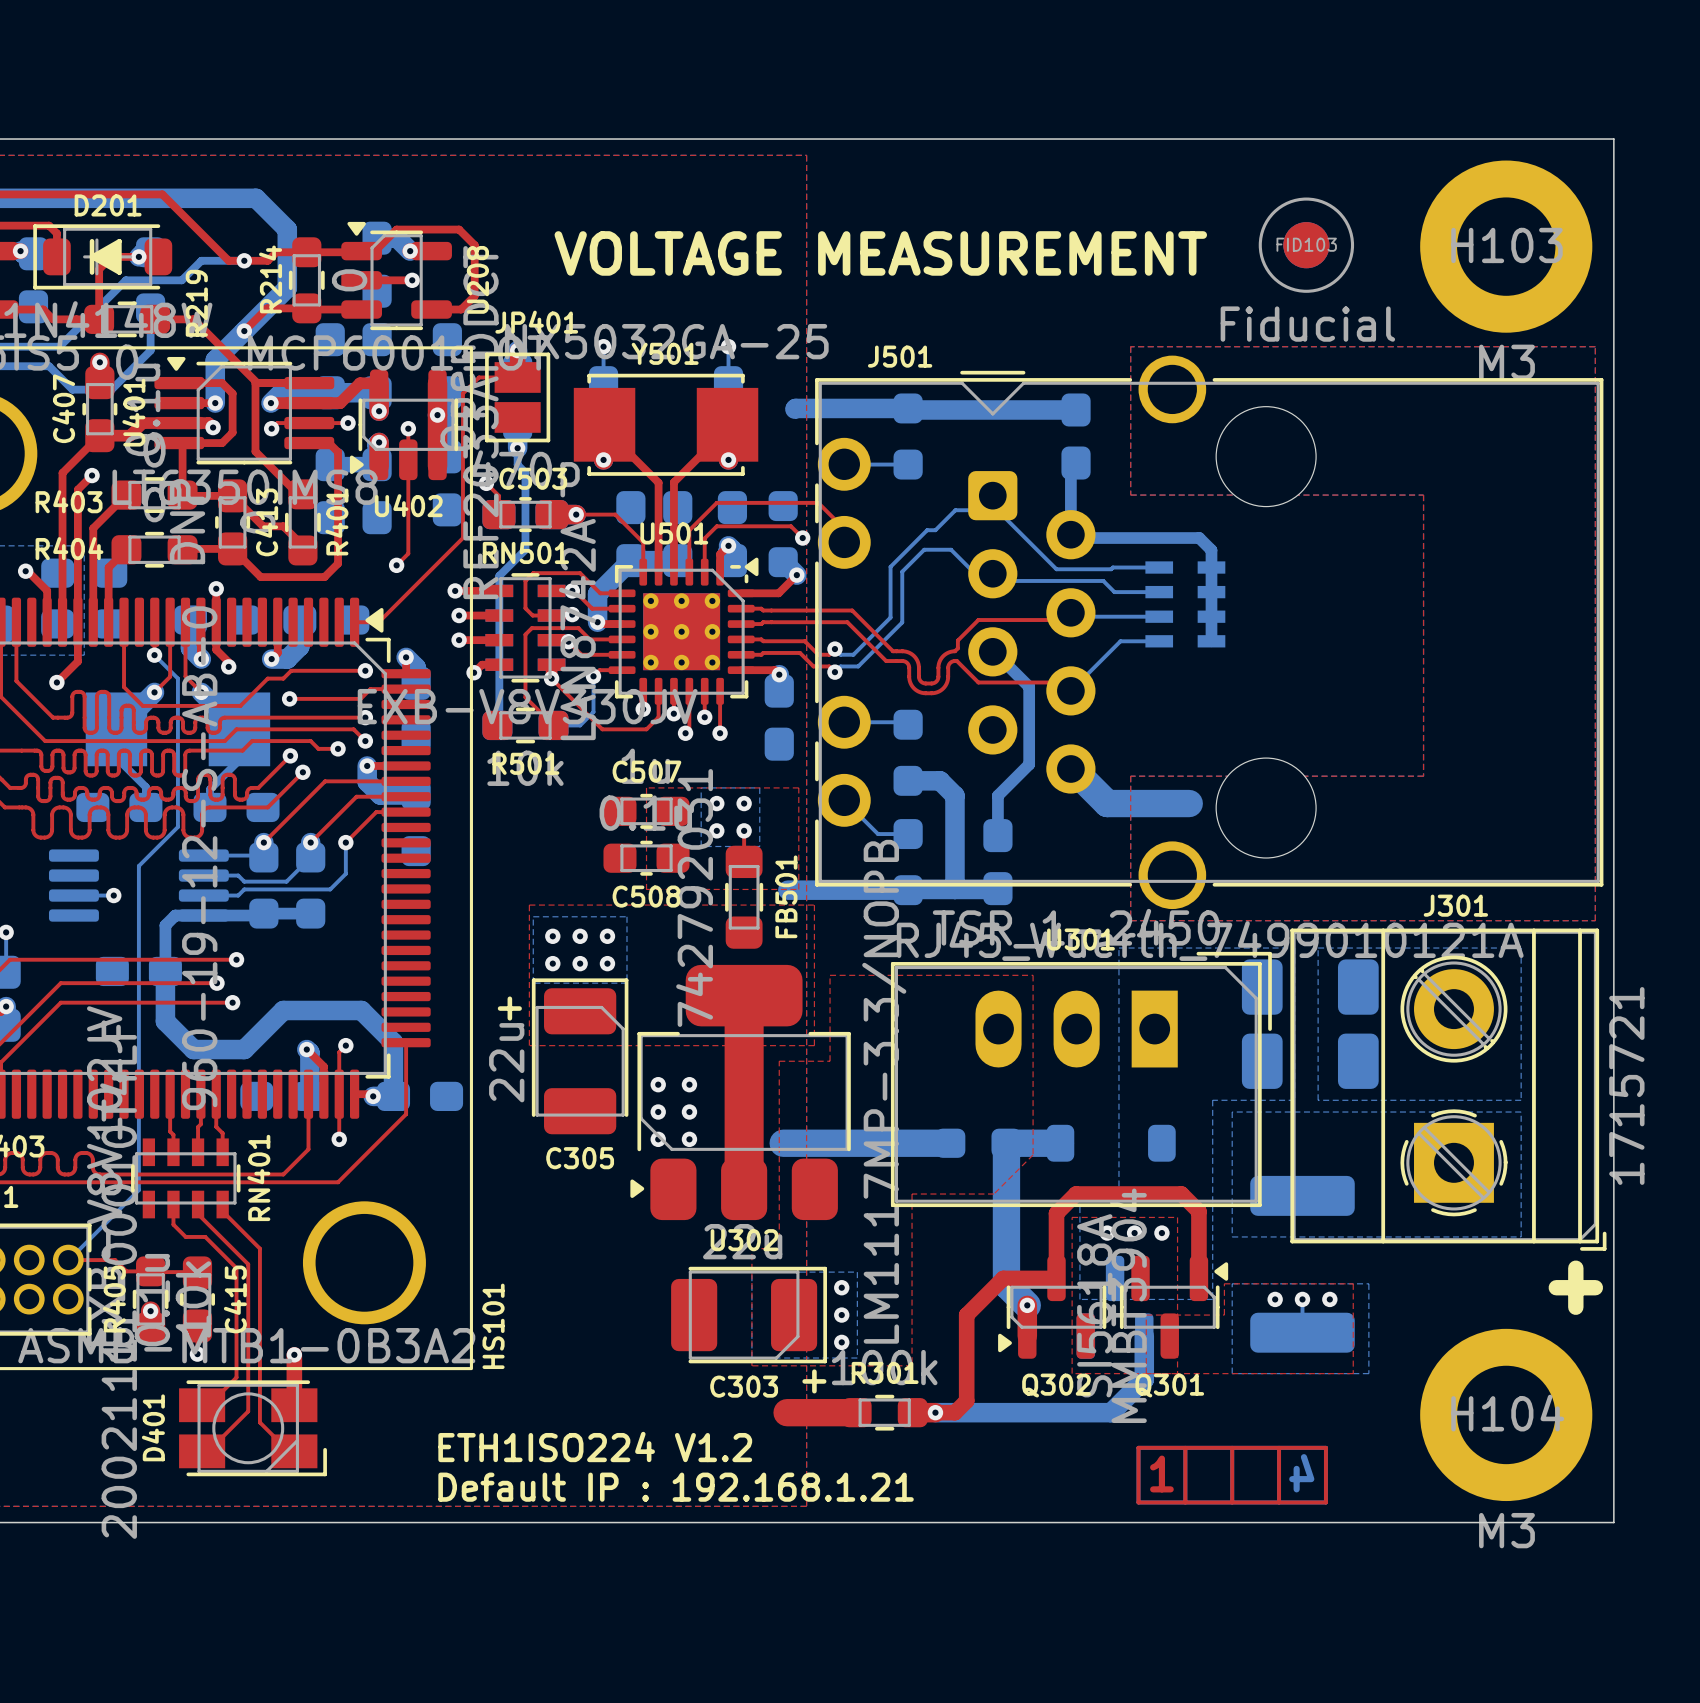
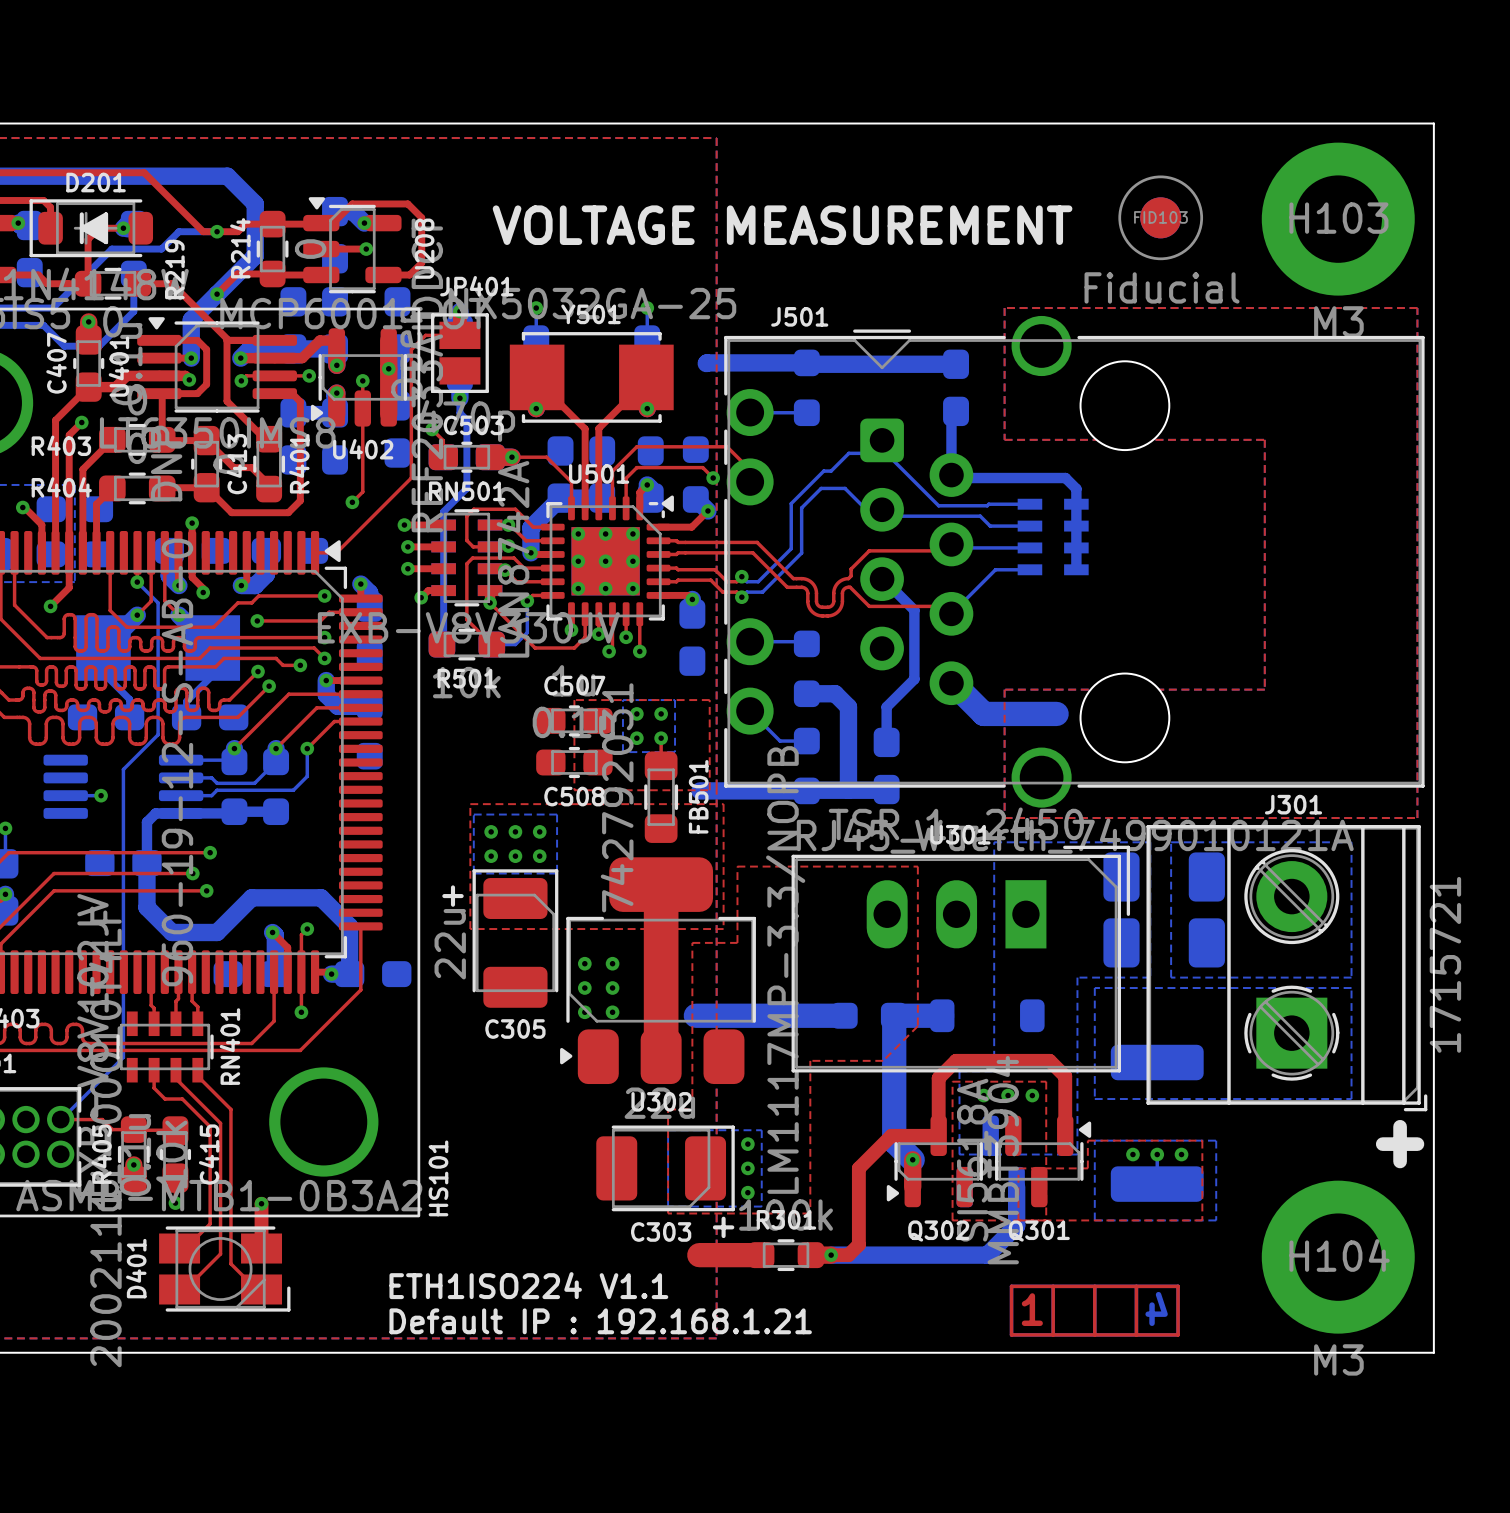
text: ETH1ISO224 V1.2 (595, 1446) -> ETH1ISO224 V1.1 (528, 1285)

